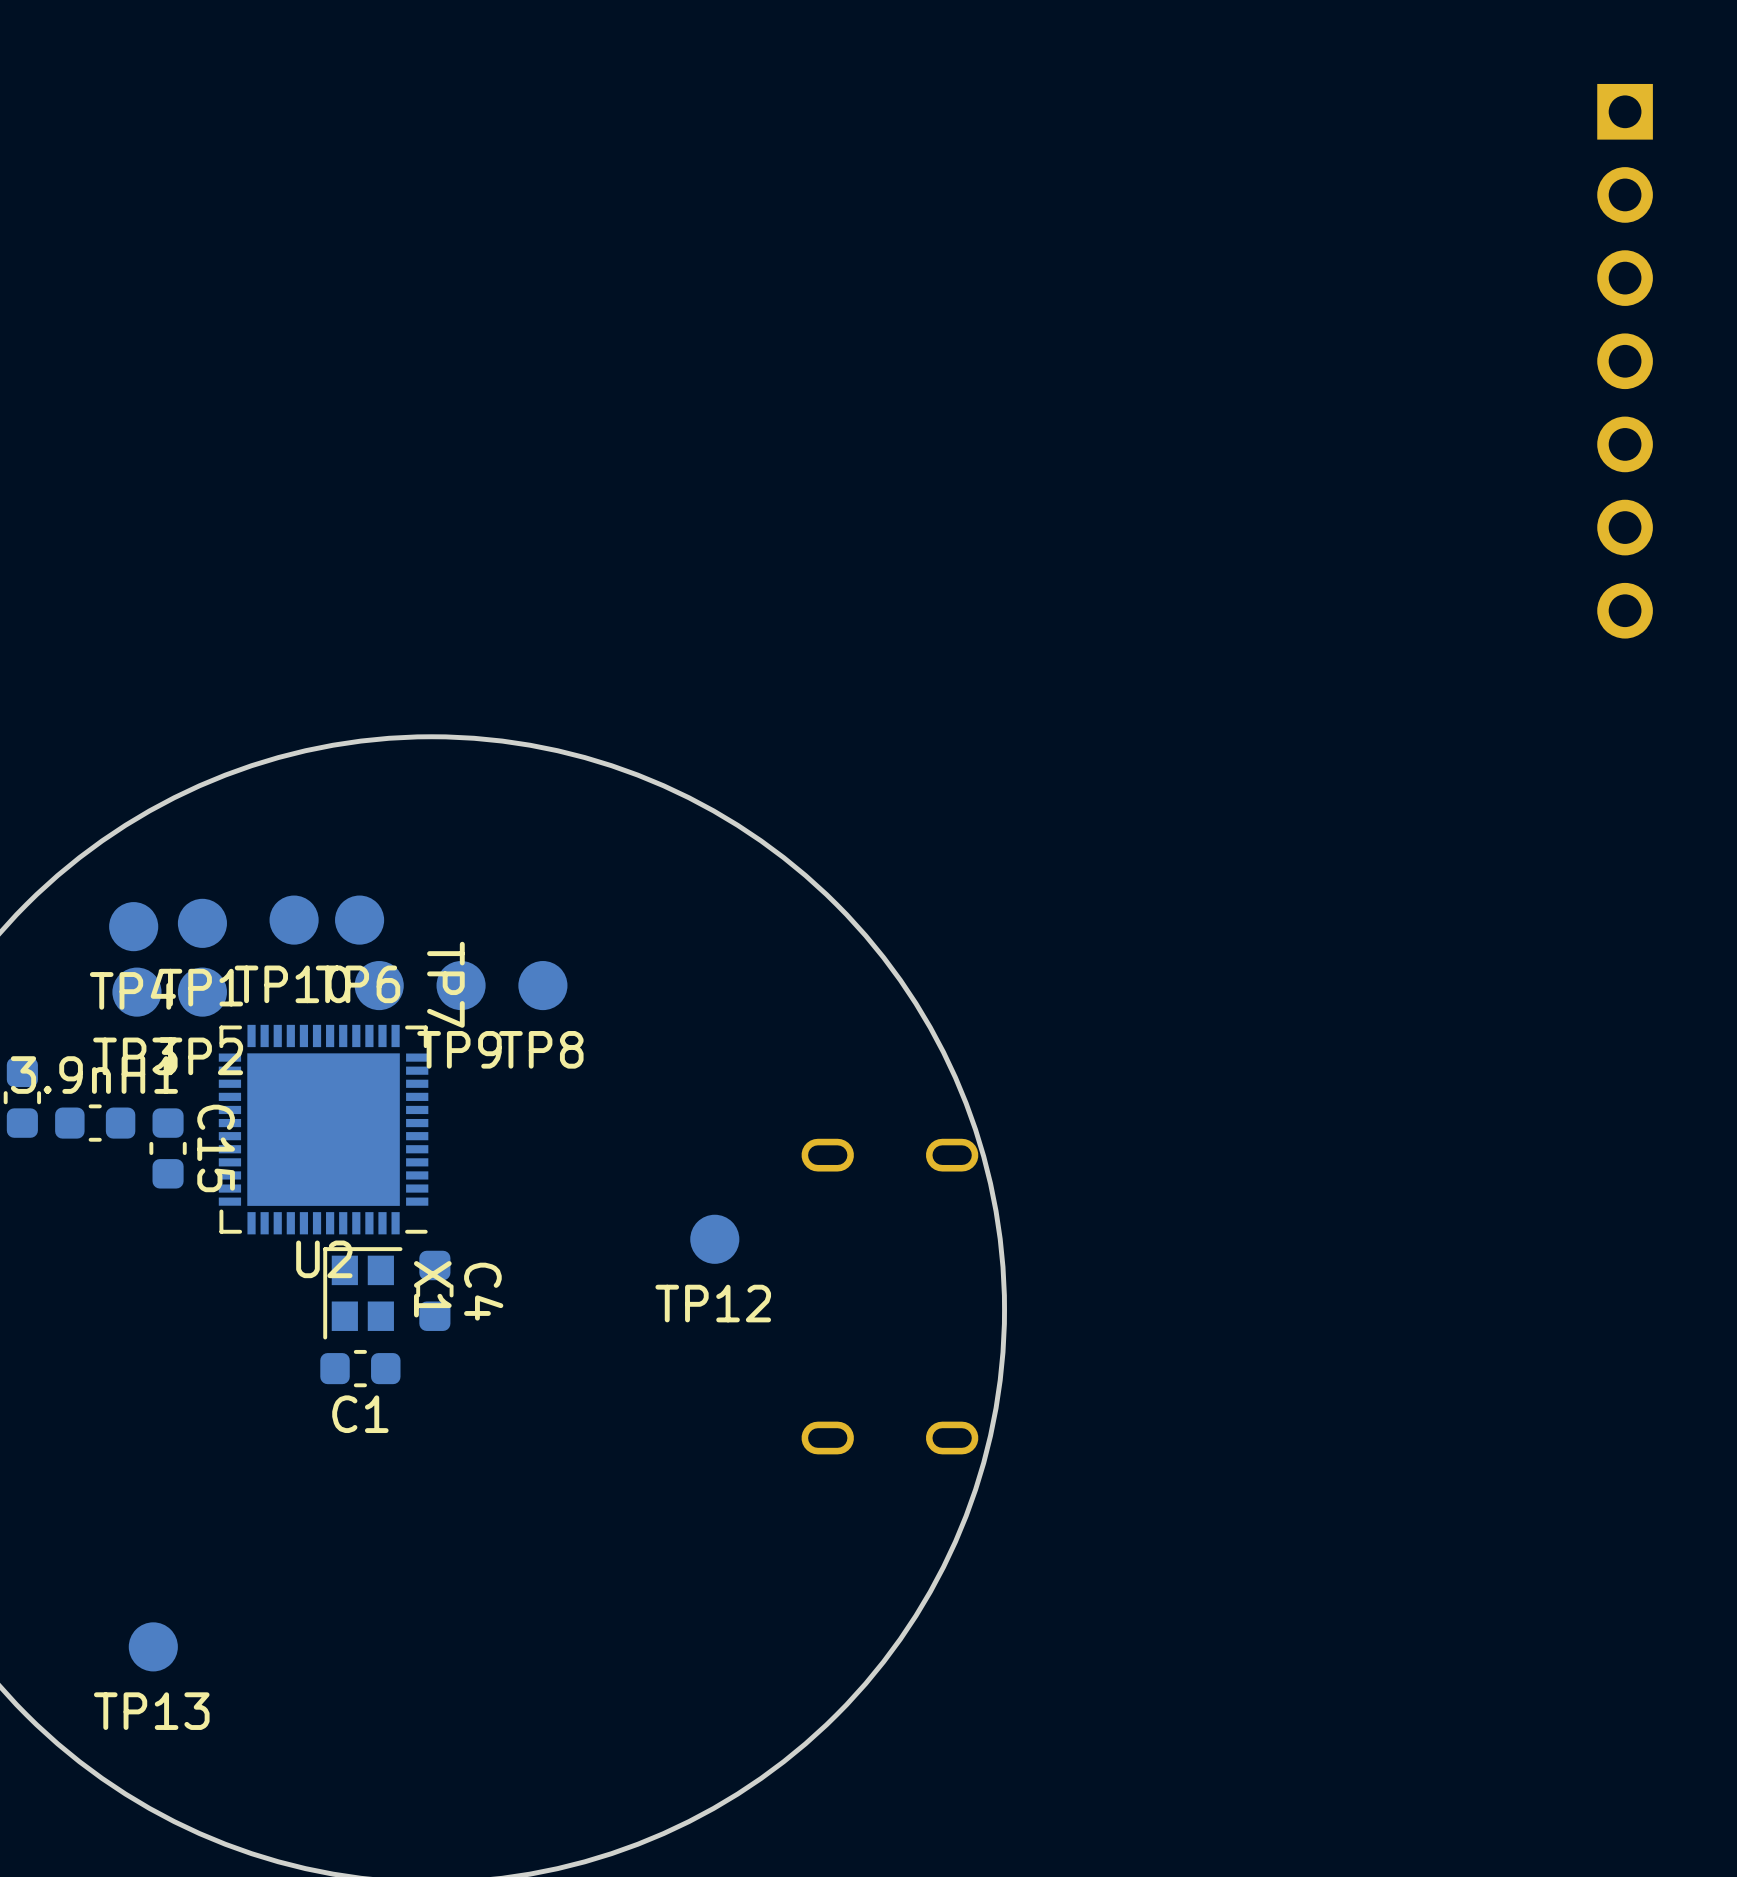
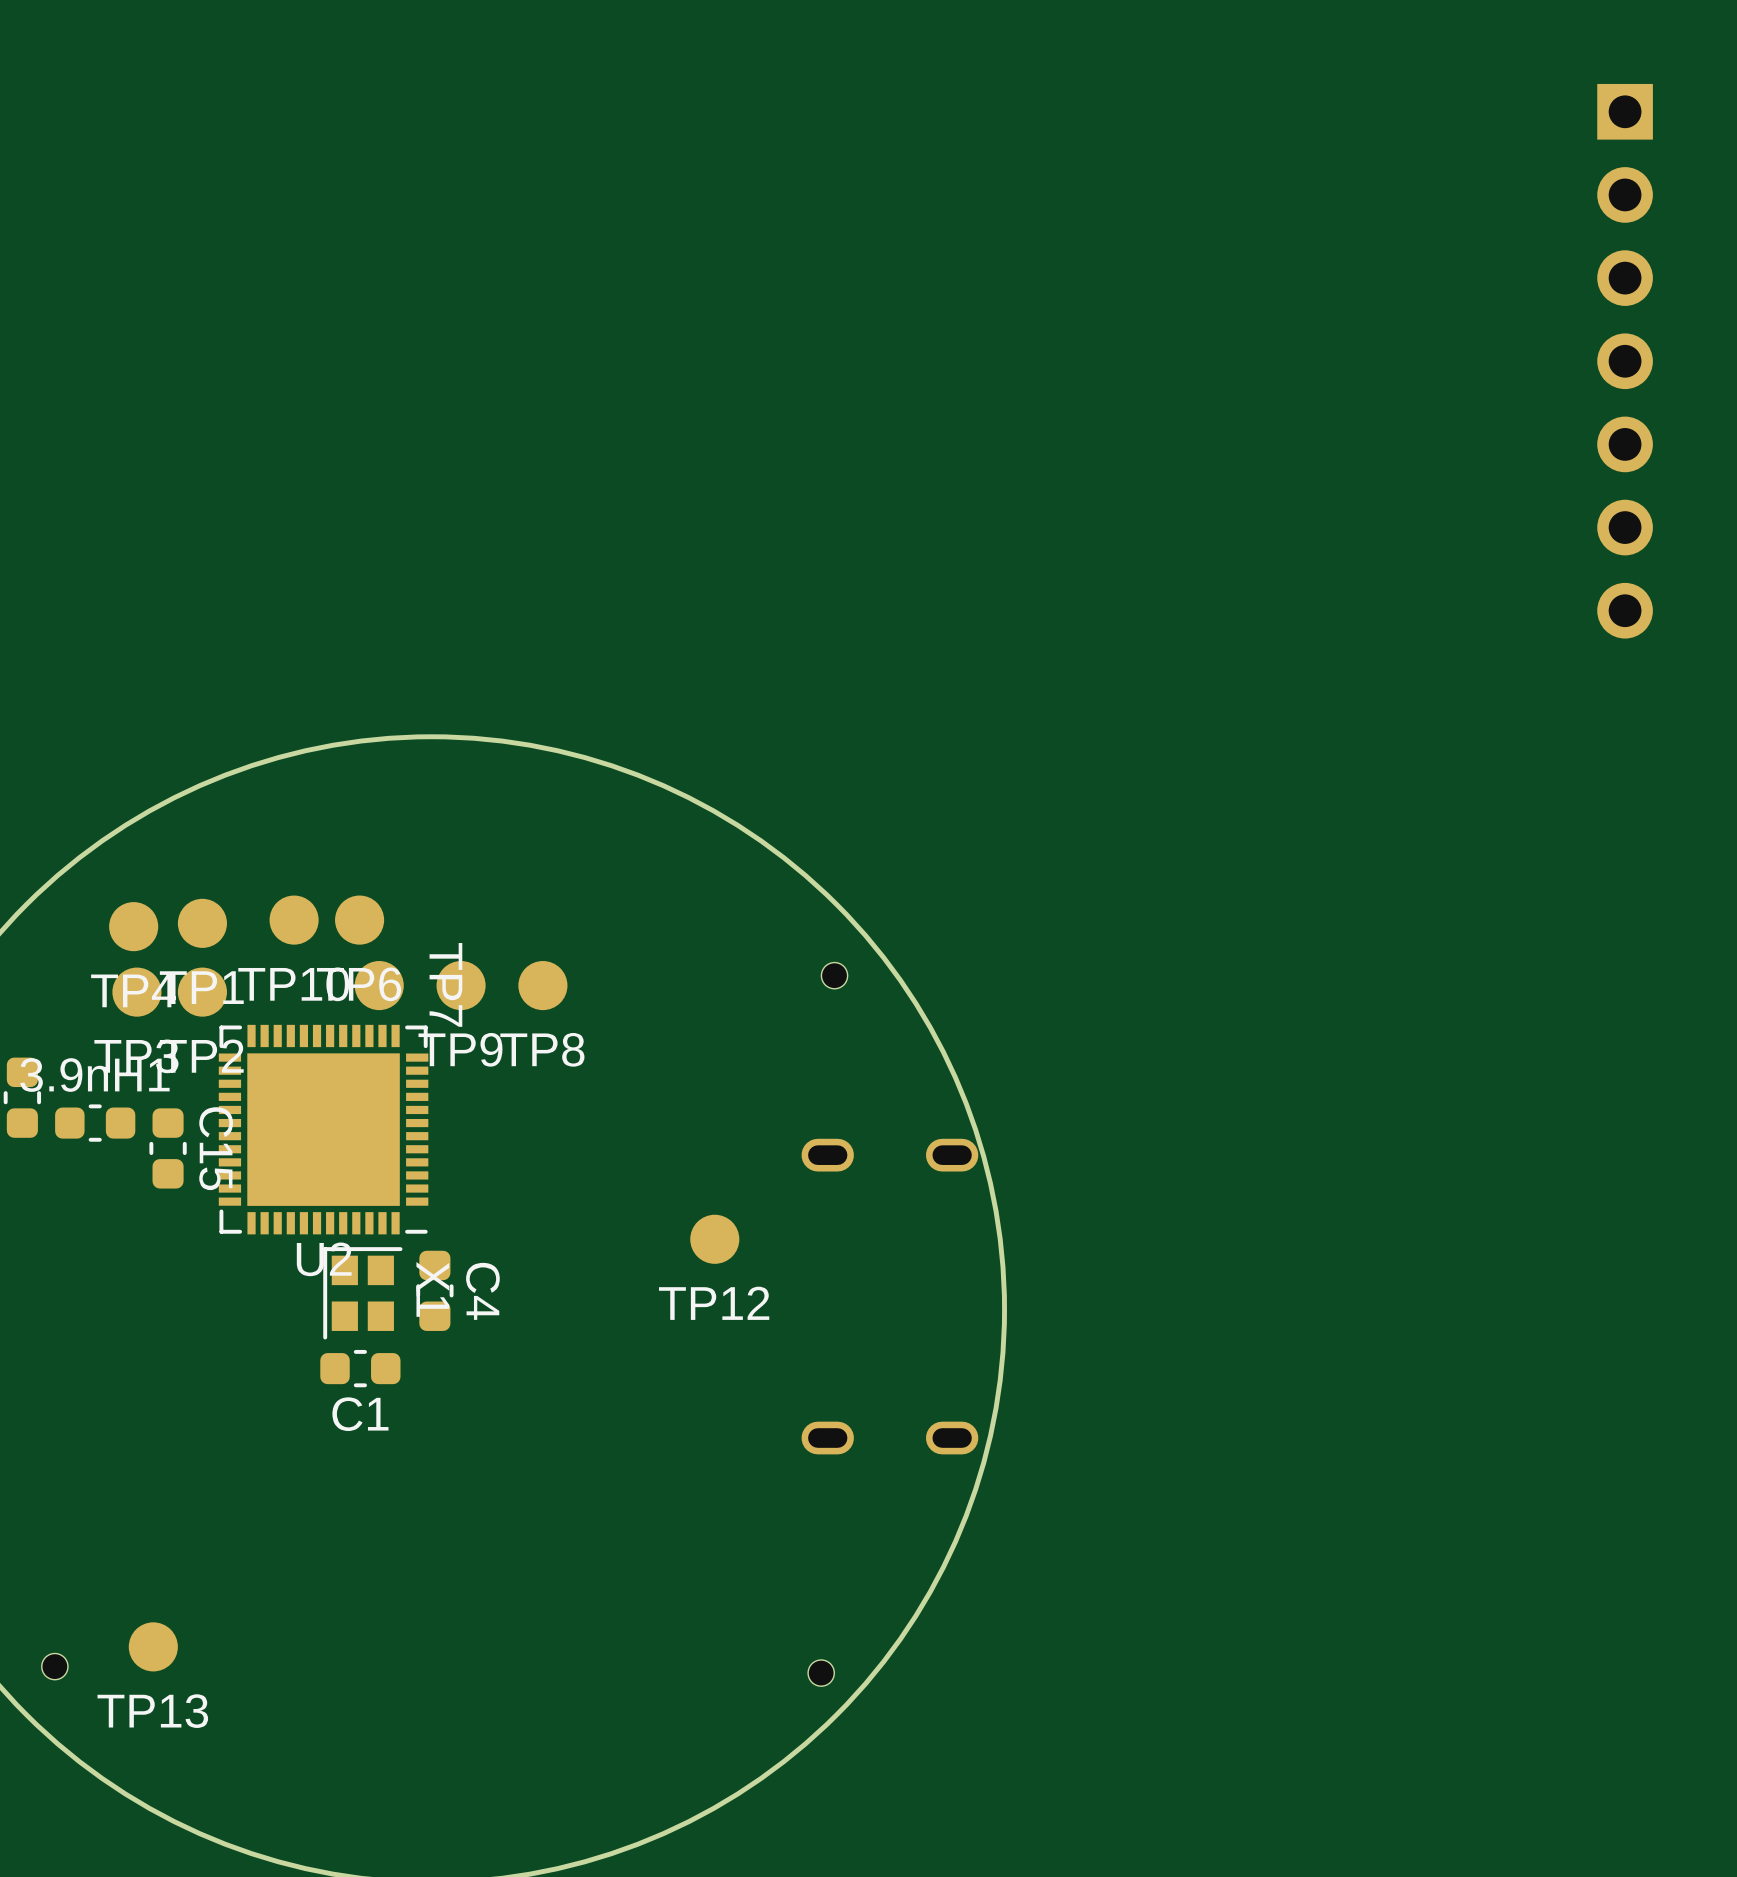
part: none -> (834, 975)
part: none -> (54, 1666)
part: none -> (821, 1673)

